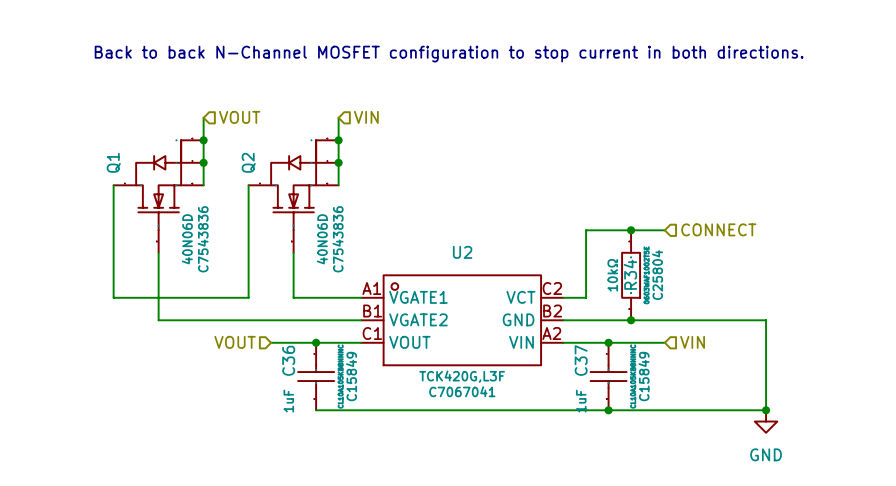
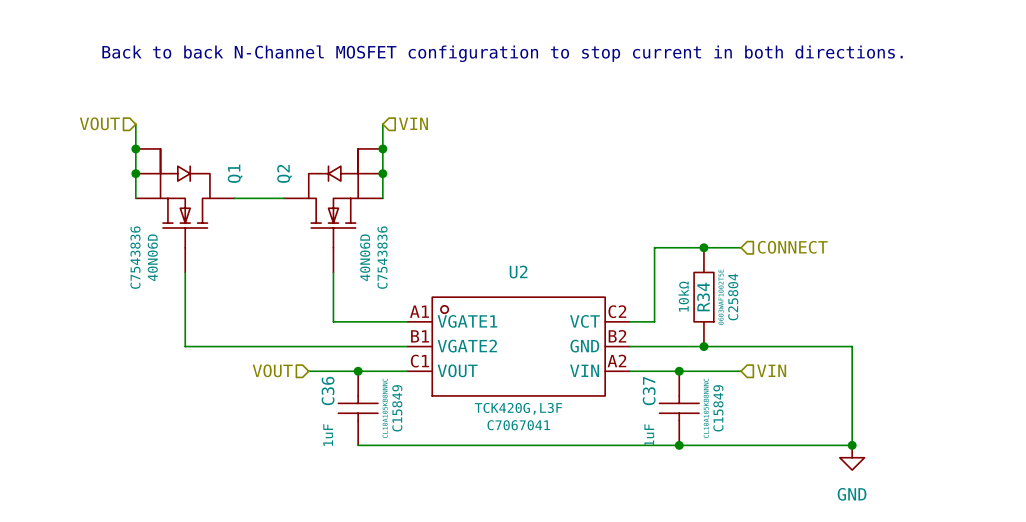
wire: (203, 117) (203, 185) -> (284, 198) (234, 198)
hierarchical label rotation: 0° (239, 117) -> 180° (99, 123)
hierarchical label position: VOUT (239, 117) -> VOUT (99, 123)
junction: none -> (135, 148)
junction: (203, 140) -> none
junction: none -> (135, 173)
junction: (203, 162) -> none
wire: (113, 185) (113, 297) (248, 297) (248, 185) -> (135, 198) (135, 124)
Q1 flip: as is (158, 185) -> left-right (185, 198)

